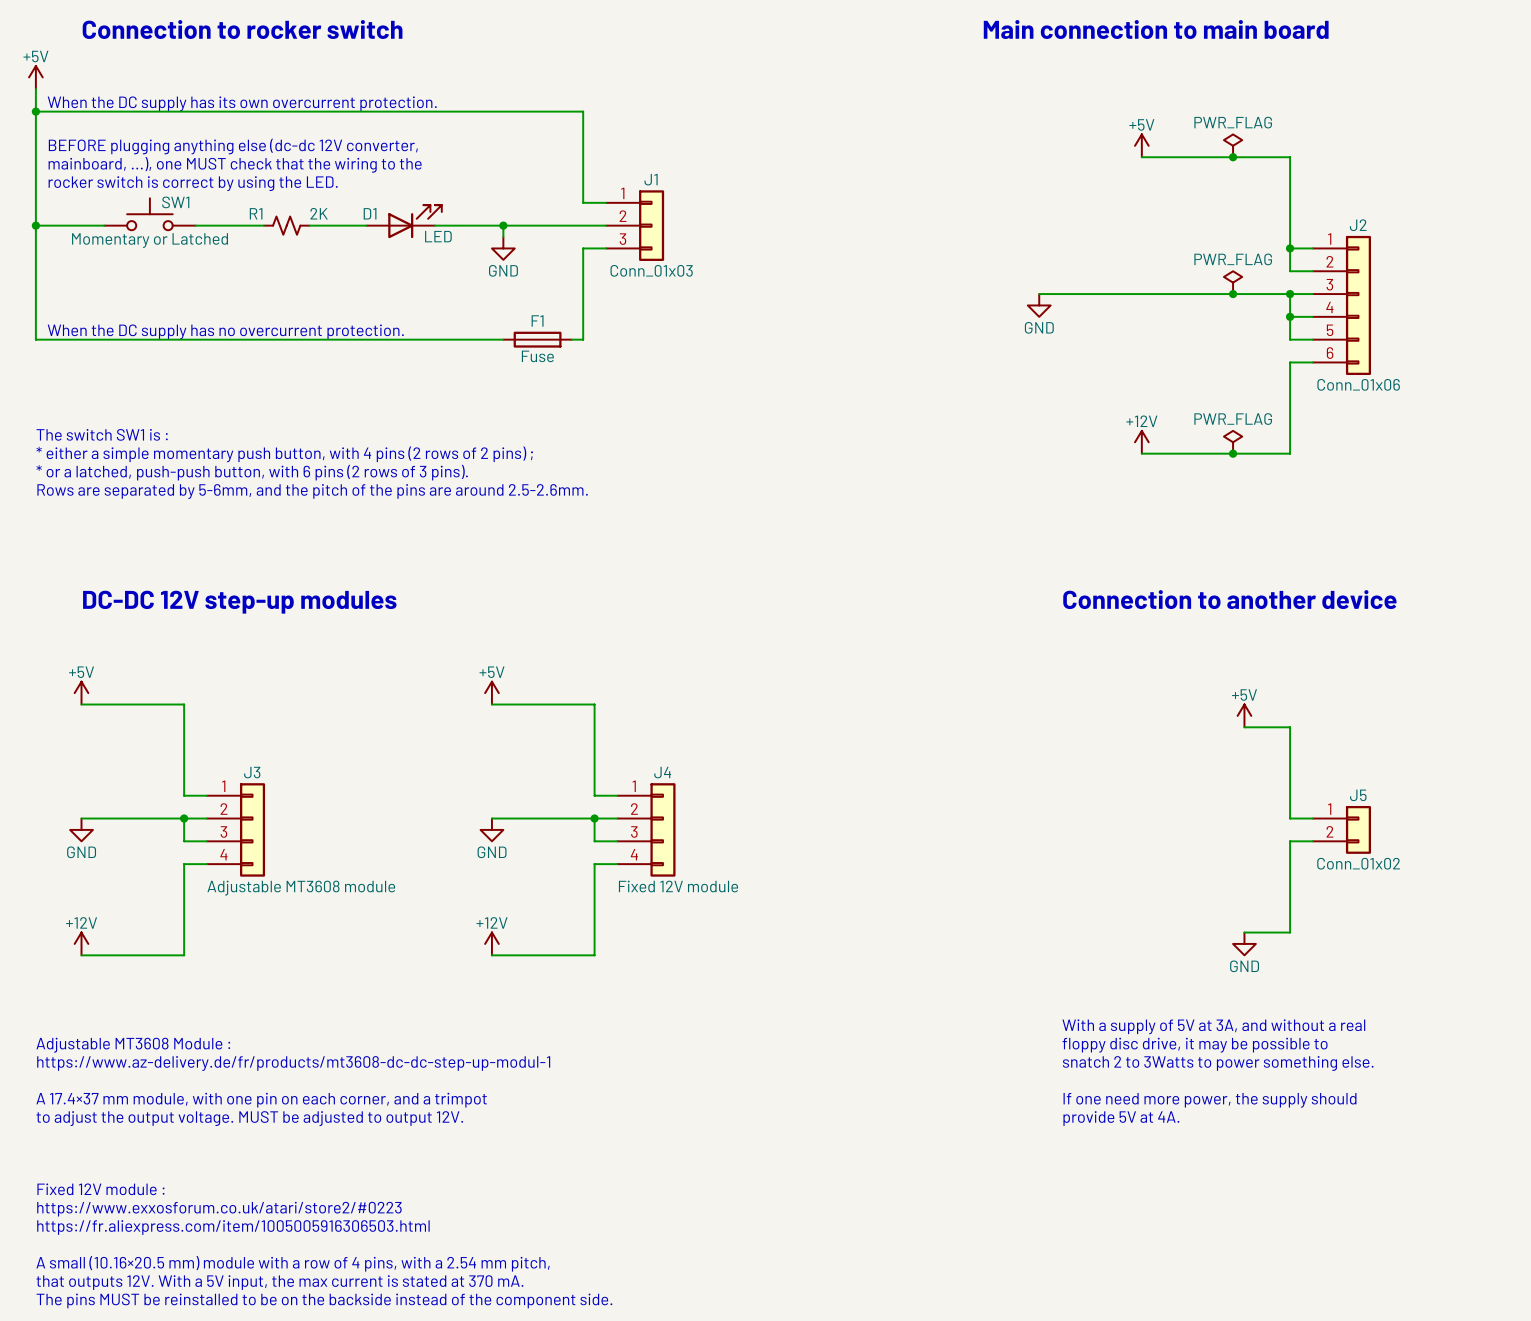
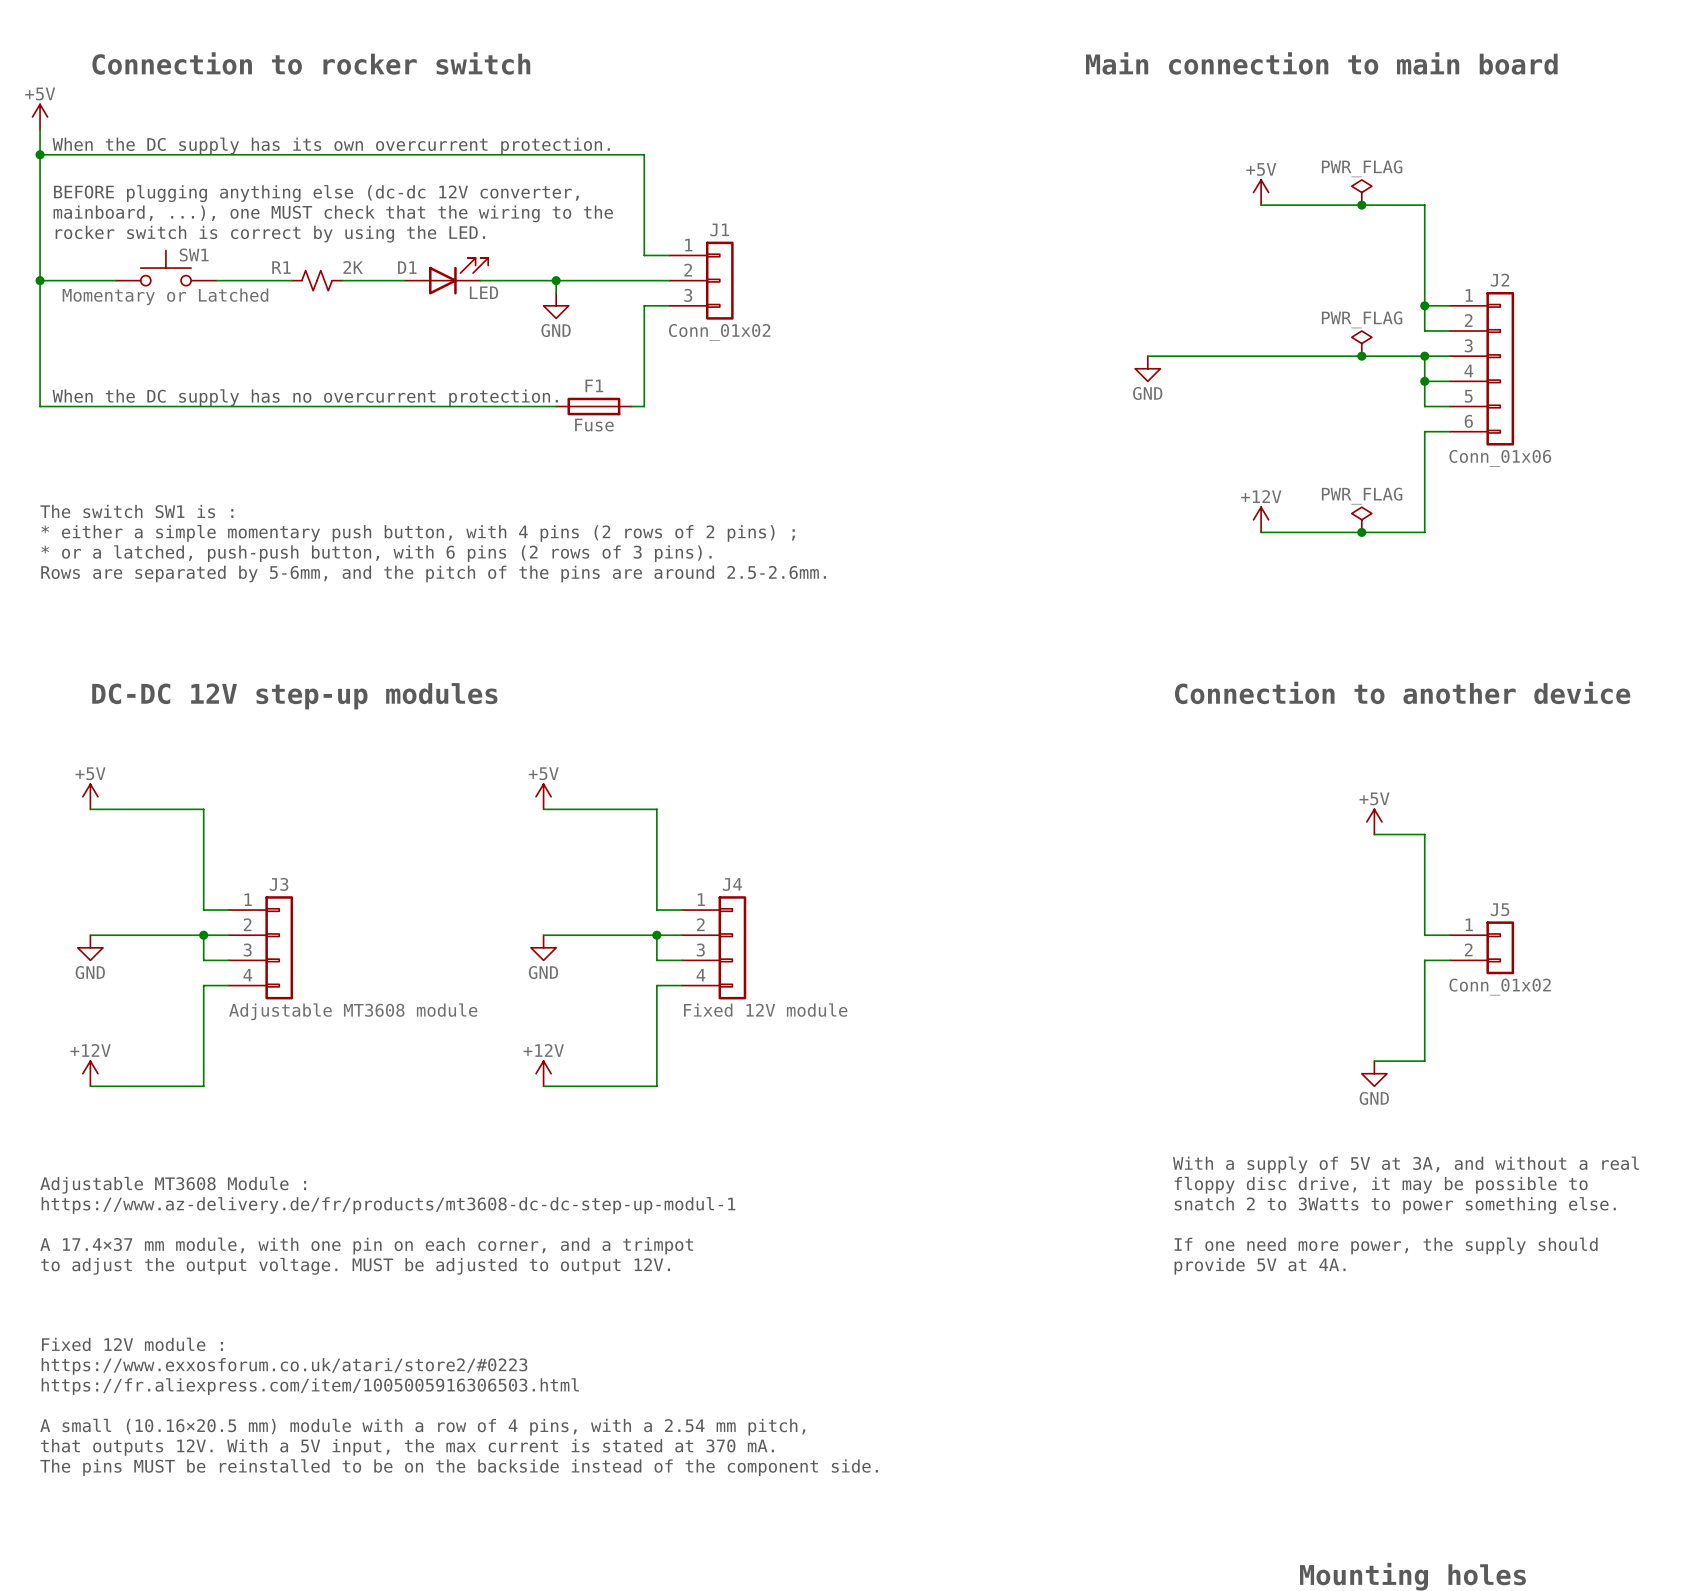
J1 value: Conn_01x03 (651, 270) -> Conn_01x02 (719, 332)

